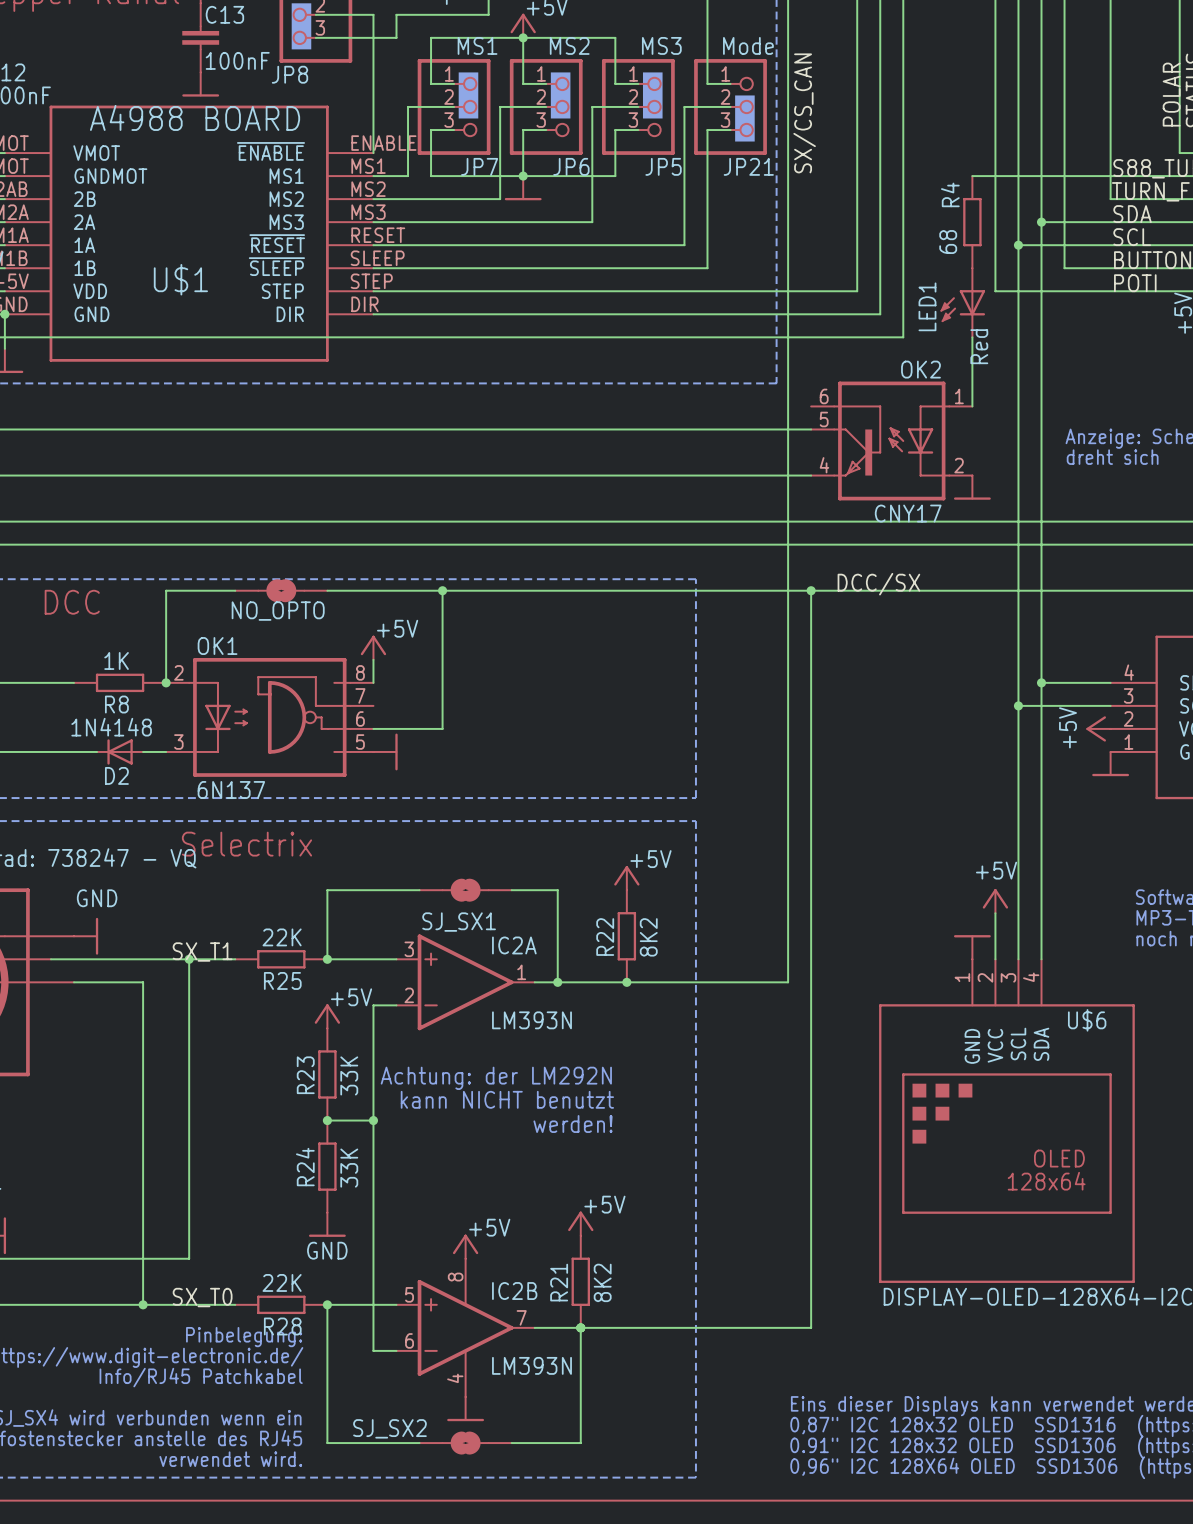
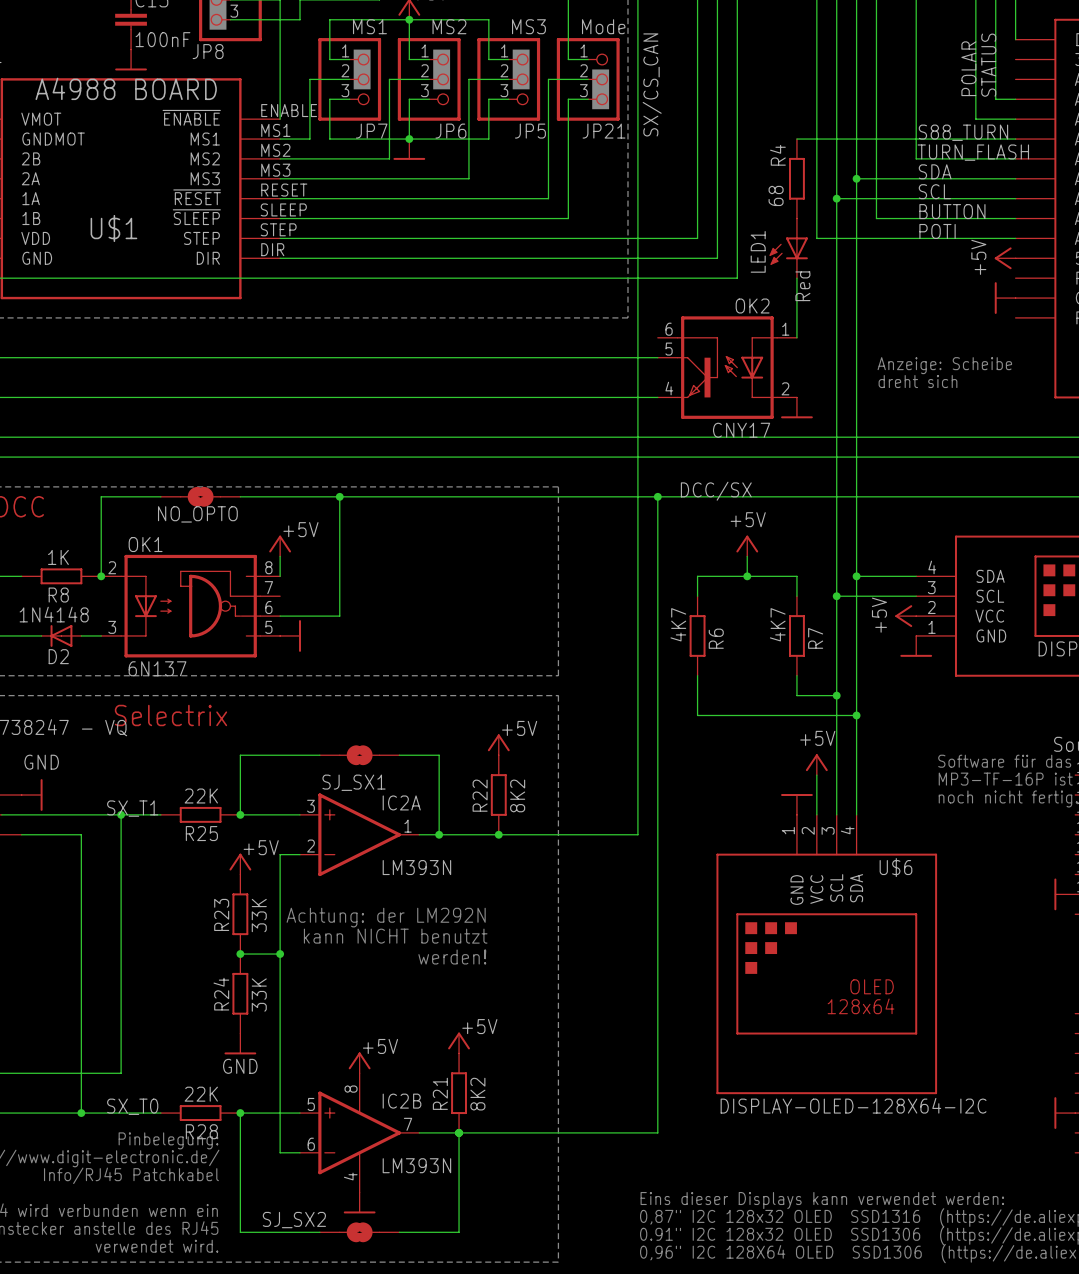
power symbol: none -> +5V (747, 546)
wire: none -> (747, 556) (747, 576)
junction: none -> (747, 576)
wire: none -> (697, 596) (697, 576) (796, 576) (796, 596)
R6: none -> 4K7 (697, 635)
R7: none -> 4K7 (796, 635)
wire: none -> (697, 675) (697, 715) (856, 715)
wire: none -> (796, 675) (796, 695) (836, 695)
junction: none -> (836, 695)
junction: none -> (856, 715)

